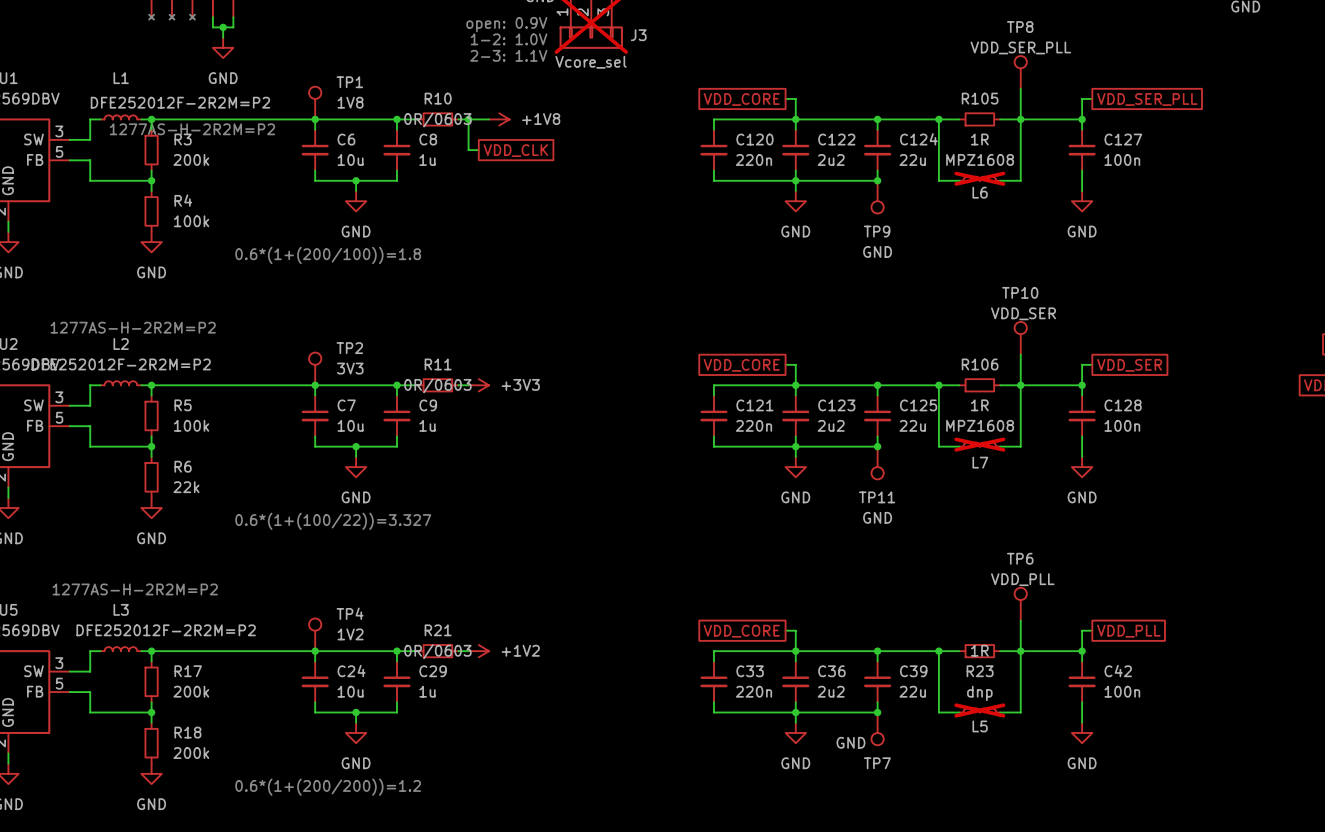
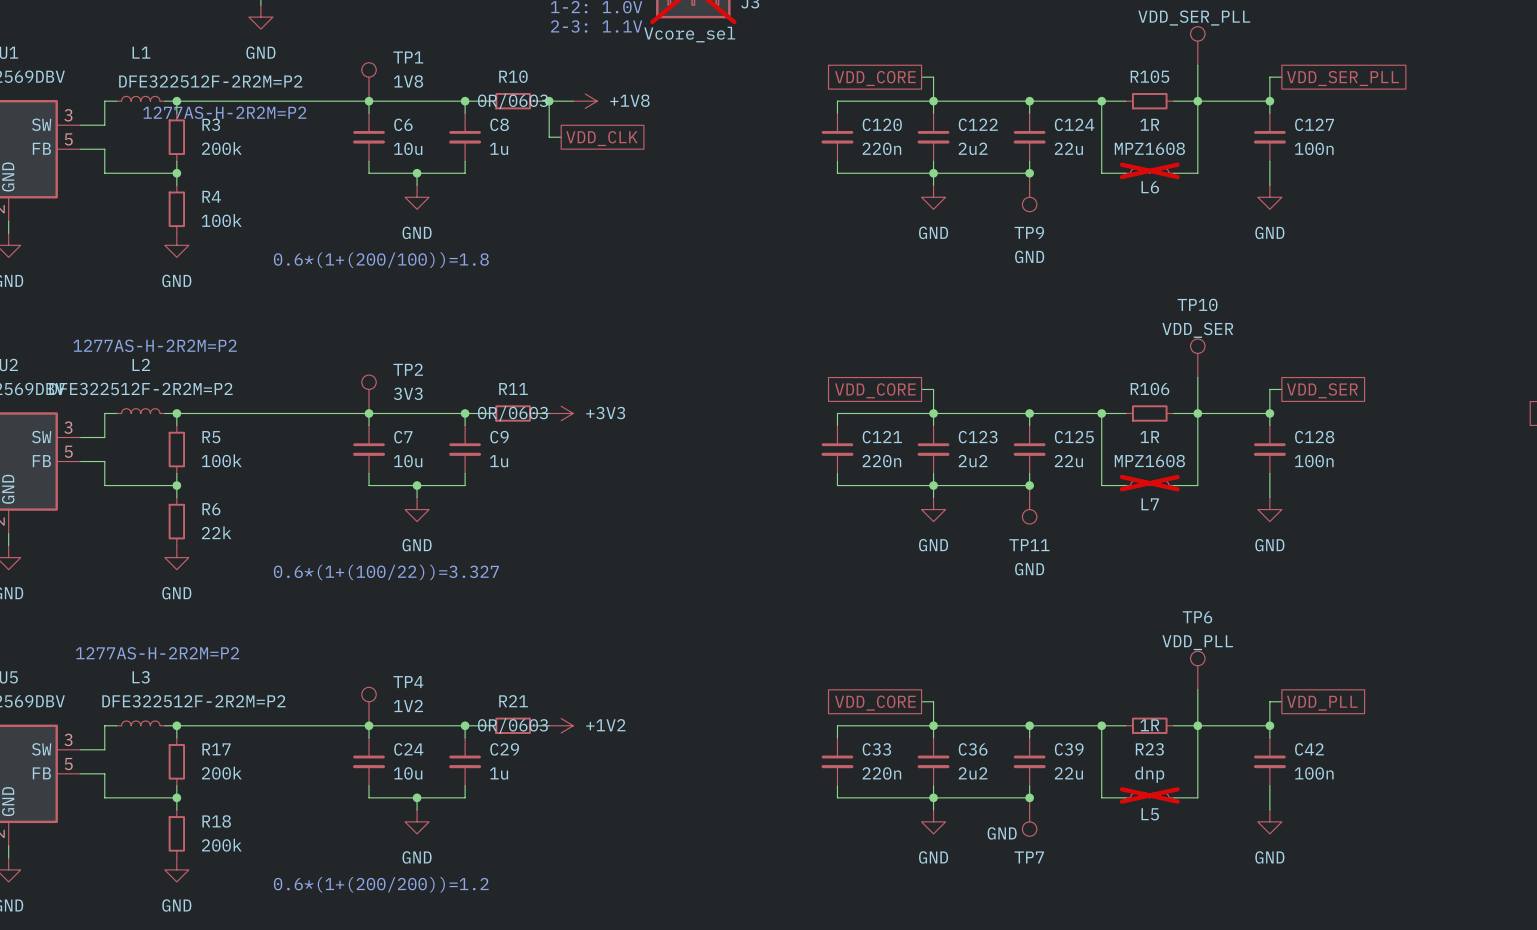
L1 value: DFE252012F-2R2M=P2 (180, 102) -> DFE322512F-2R2M=P2 (210, 81)
L2 value: DFE252012F-2R2M=P2 (121, 364) -> DFE322512F-2R2M=P2 (141, 389)
L3 value: DFE252012F-2R2M=P2 (166, 630) -> DFE322512F-2R2M=P2 (193, 701)

